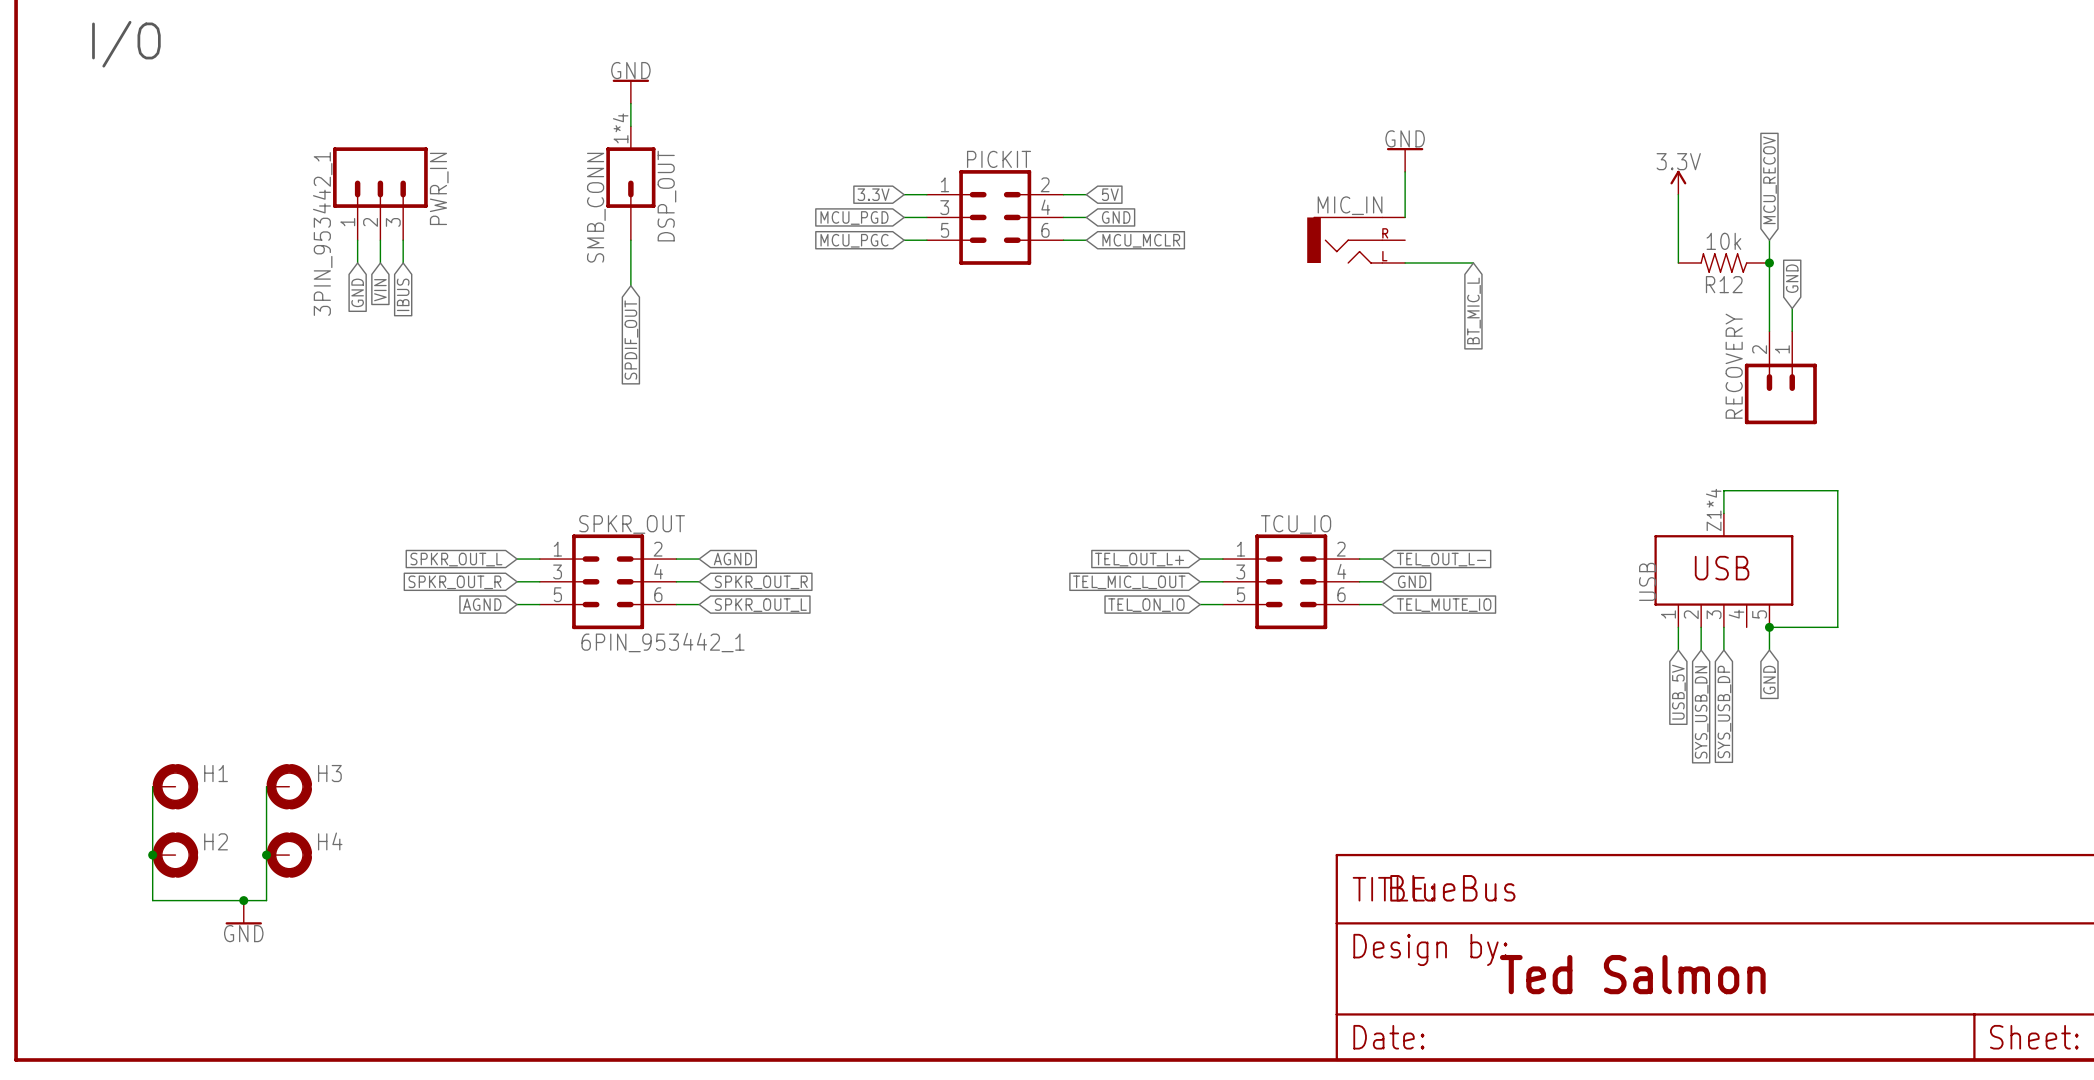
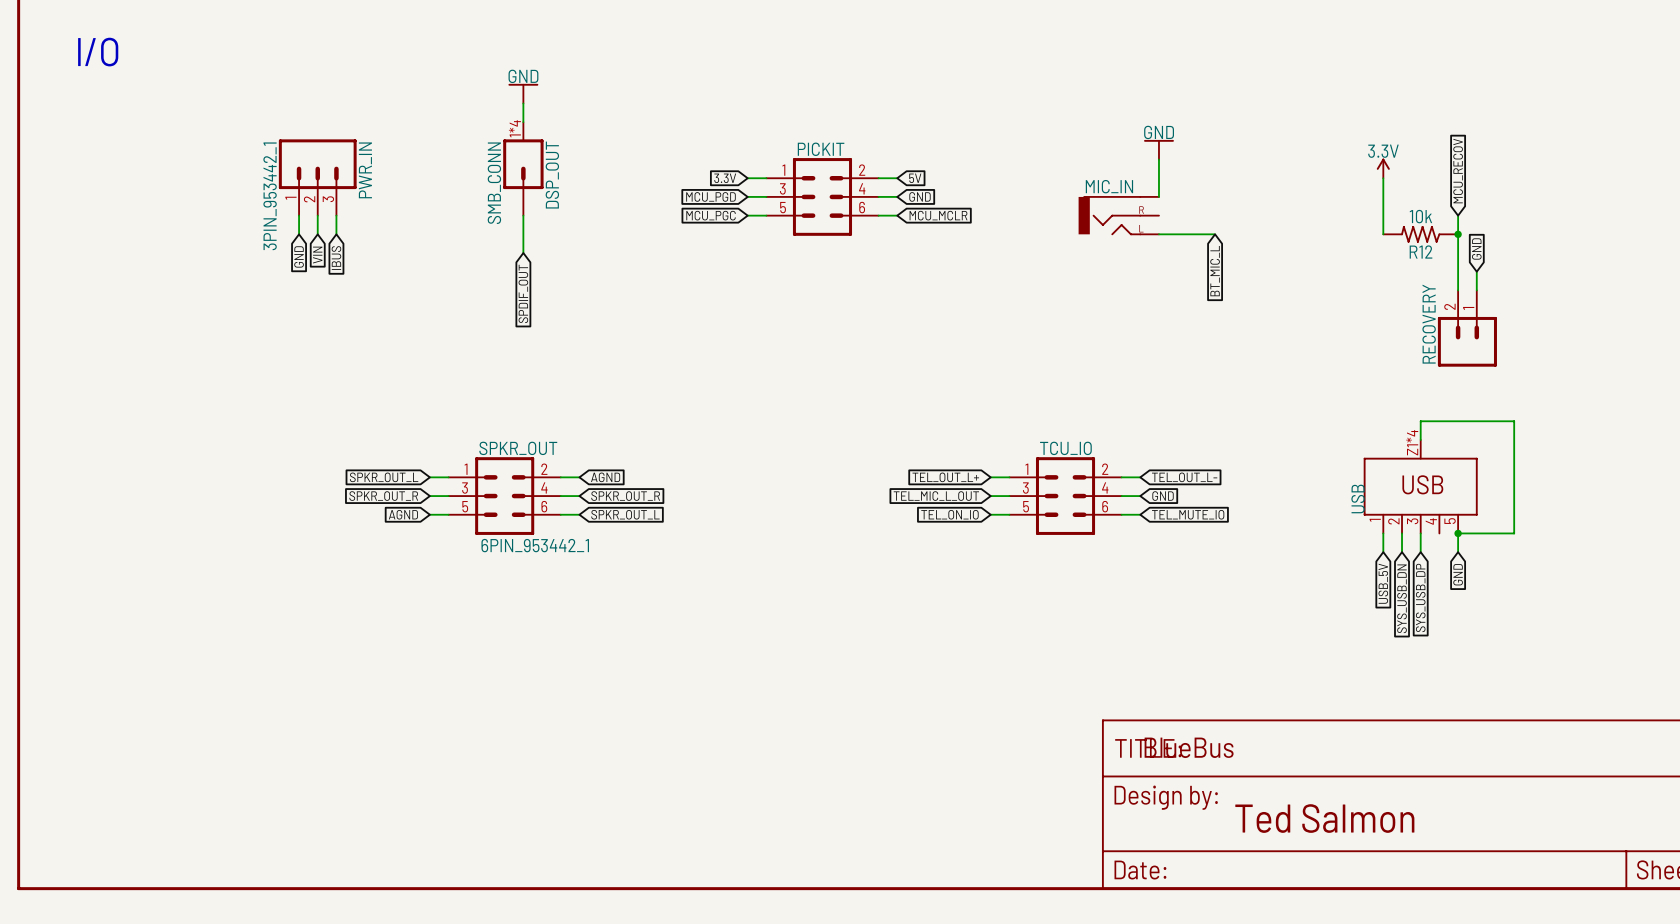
wire: (152, 786) (152, 900) (266, 900) (266, 786) -> none
H1: (175, 786) -> none
H3: (289, 786) -> none
junction: (152, 855) -> none
H2: (175, 855) -> none
junction: (266, 855) -> none
H4: (289, 855) -> none
junction: (243, 900) -> none
power symbol: GND (243, 912) -> none

